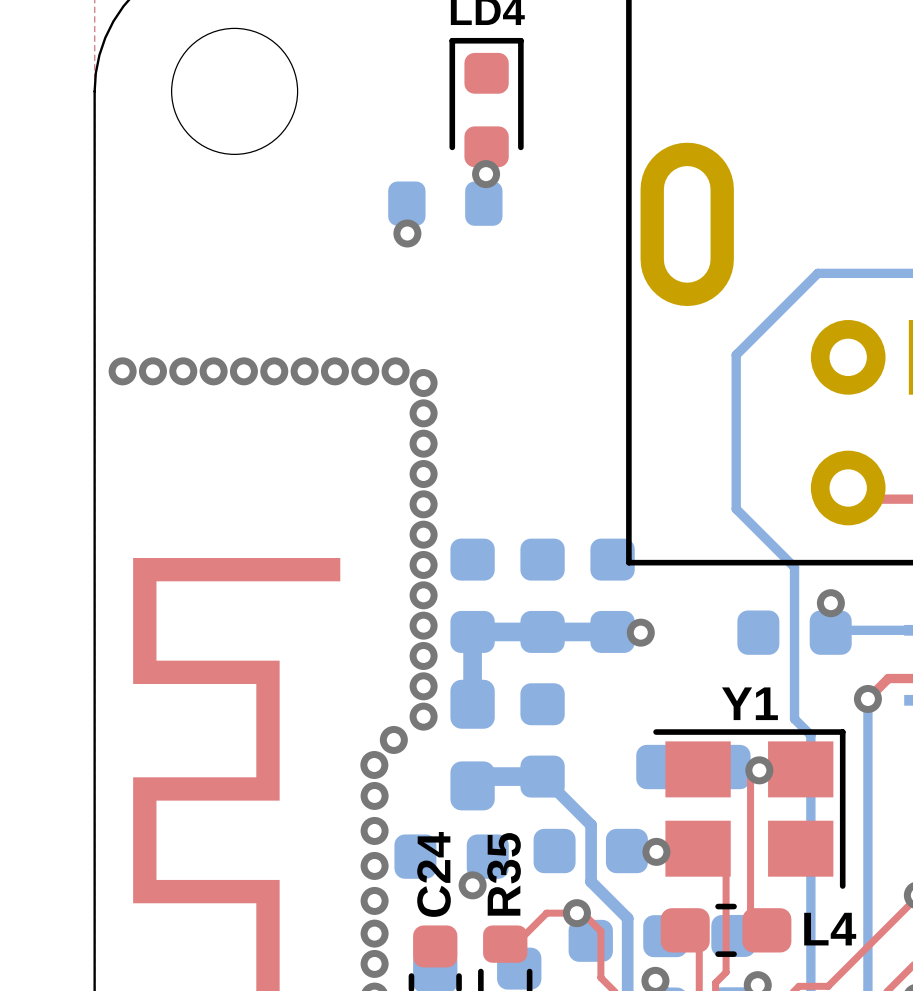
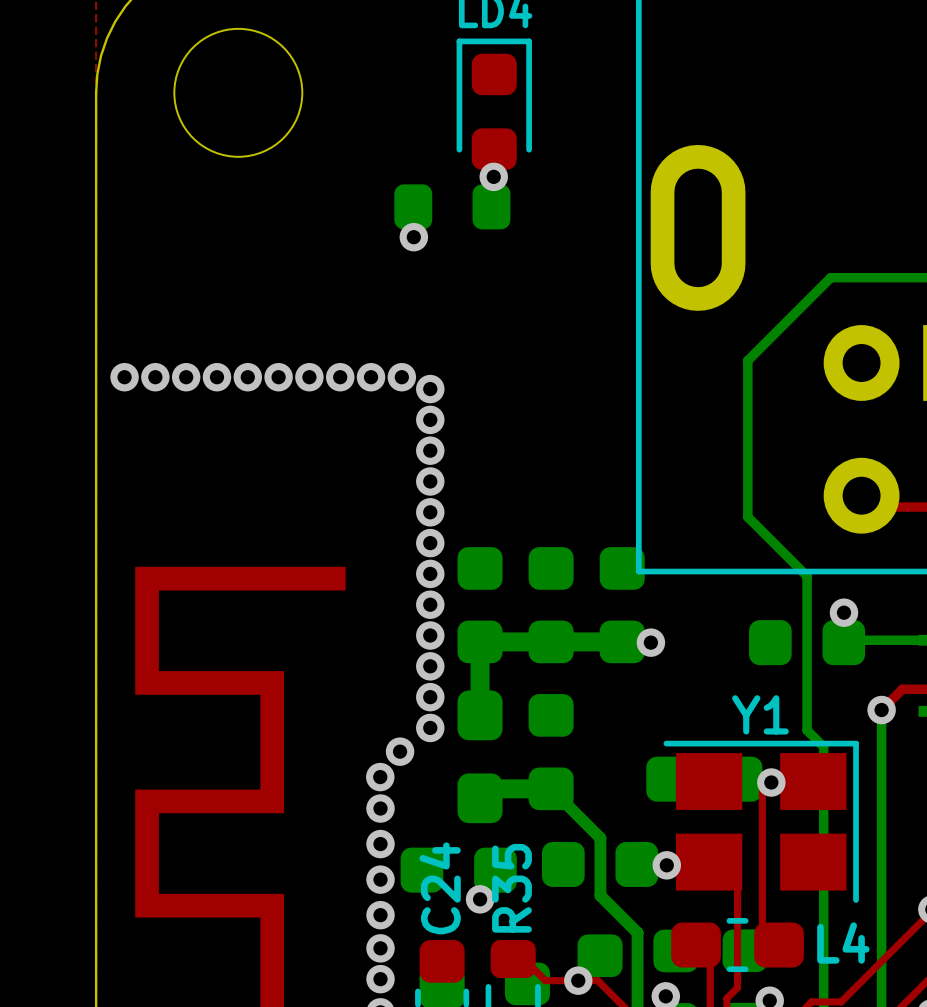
via position: (576, 913) -> (578, 980)
top track: (505, 944) (515, 944) (546, 913) (582, 913) (600, 931) (600, 977) -> (523, 959) (545, 980) (597, 980) (610, 993)

